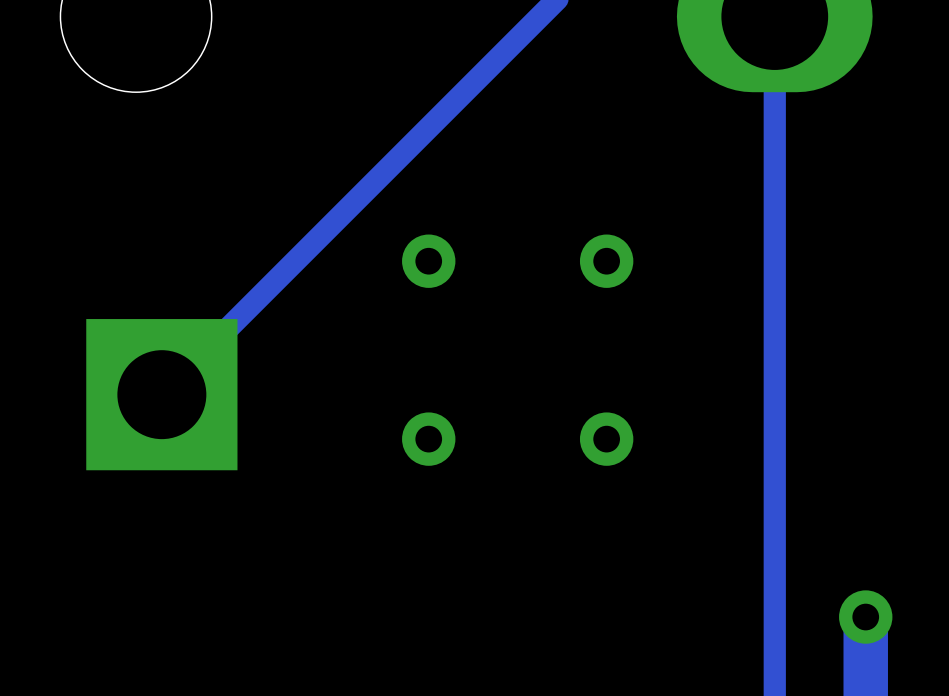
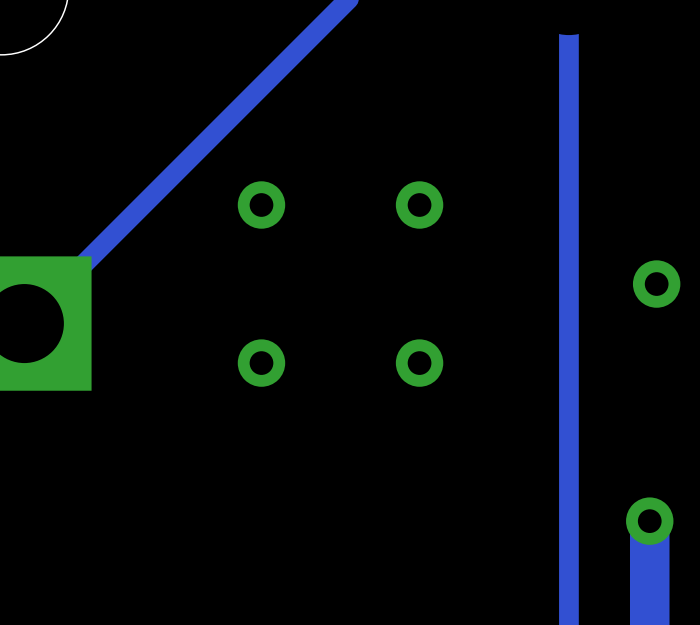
via: none -> (656, 284)

